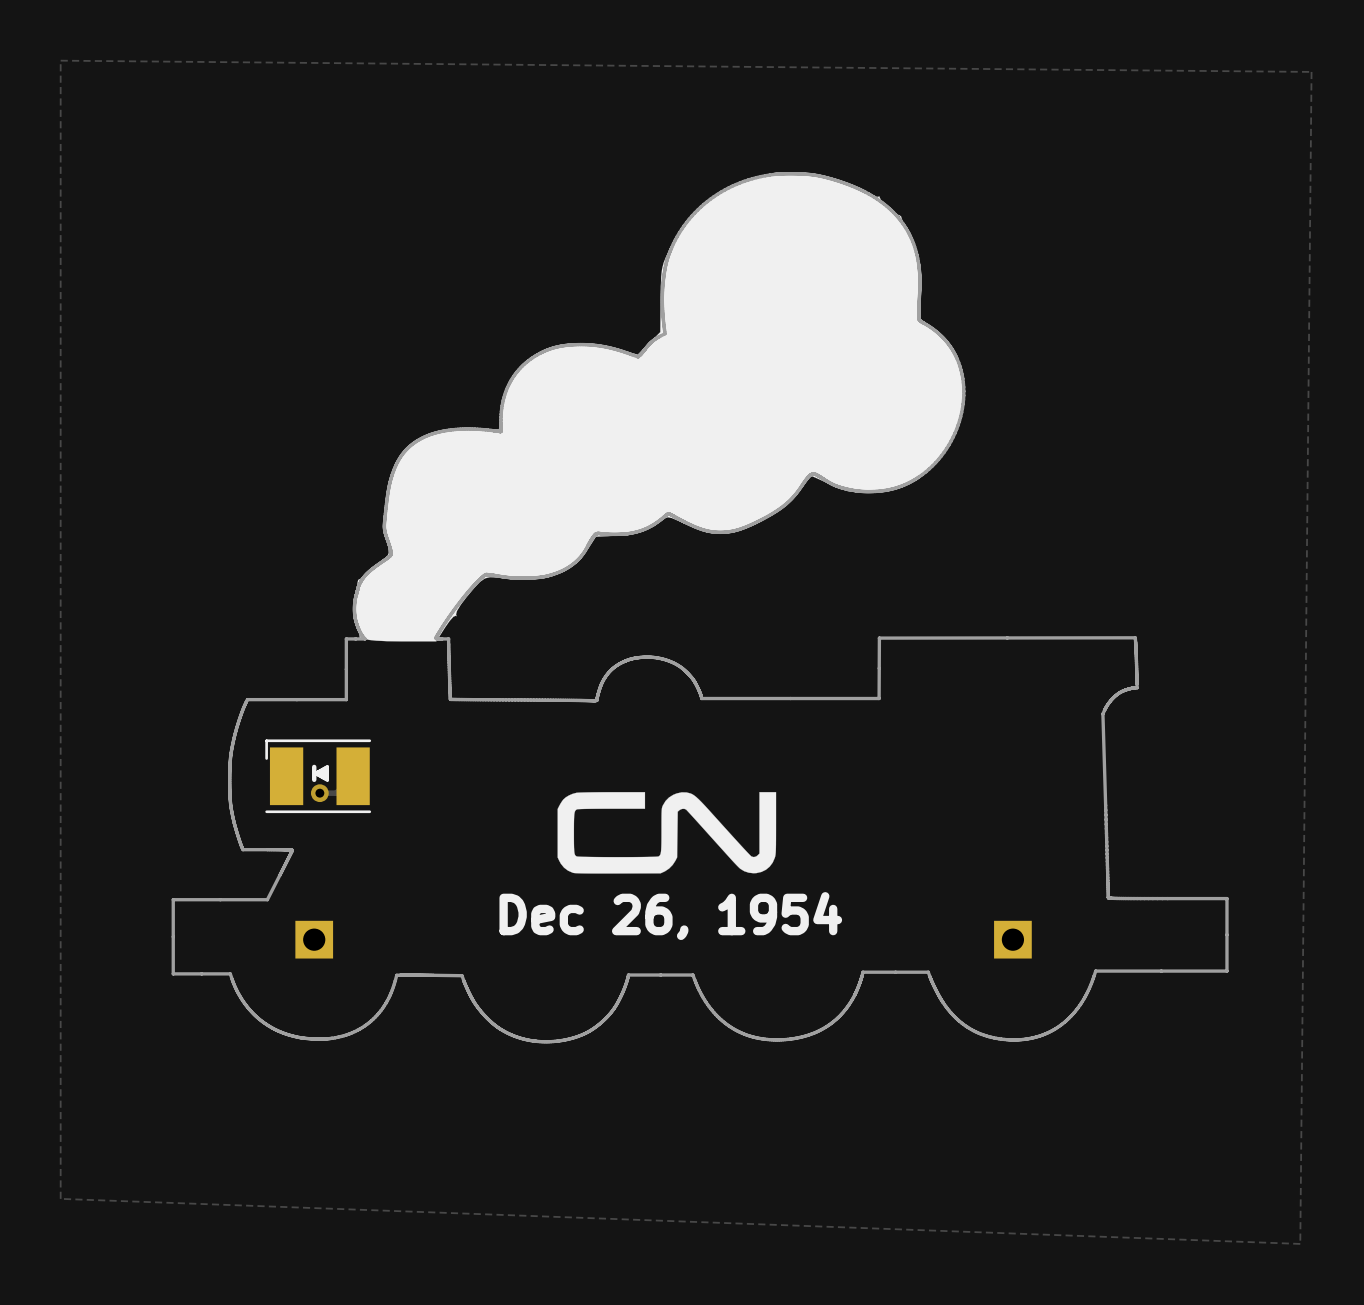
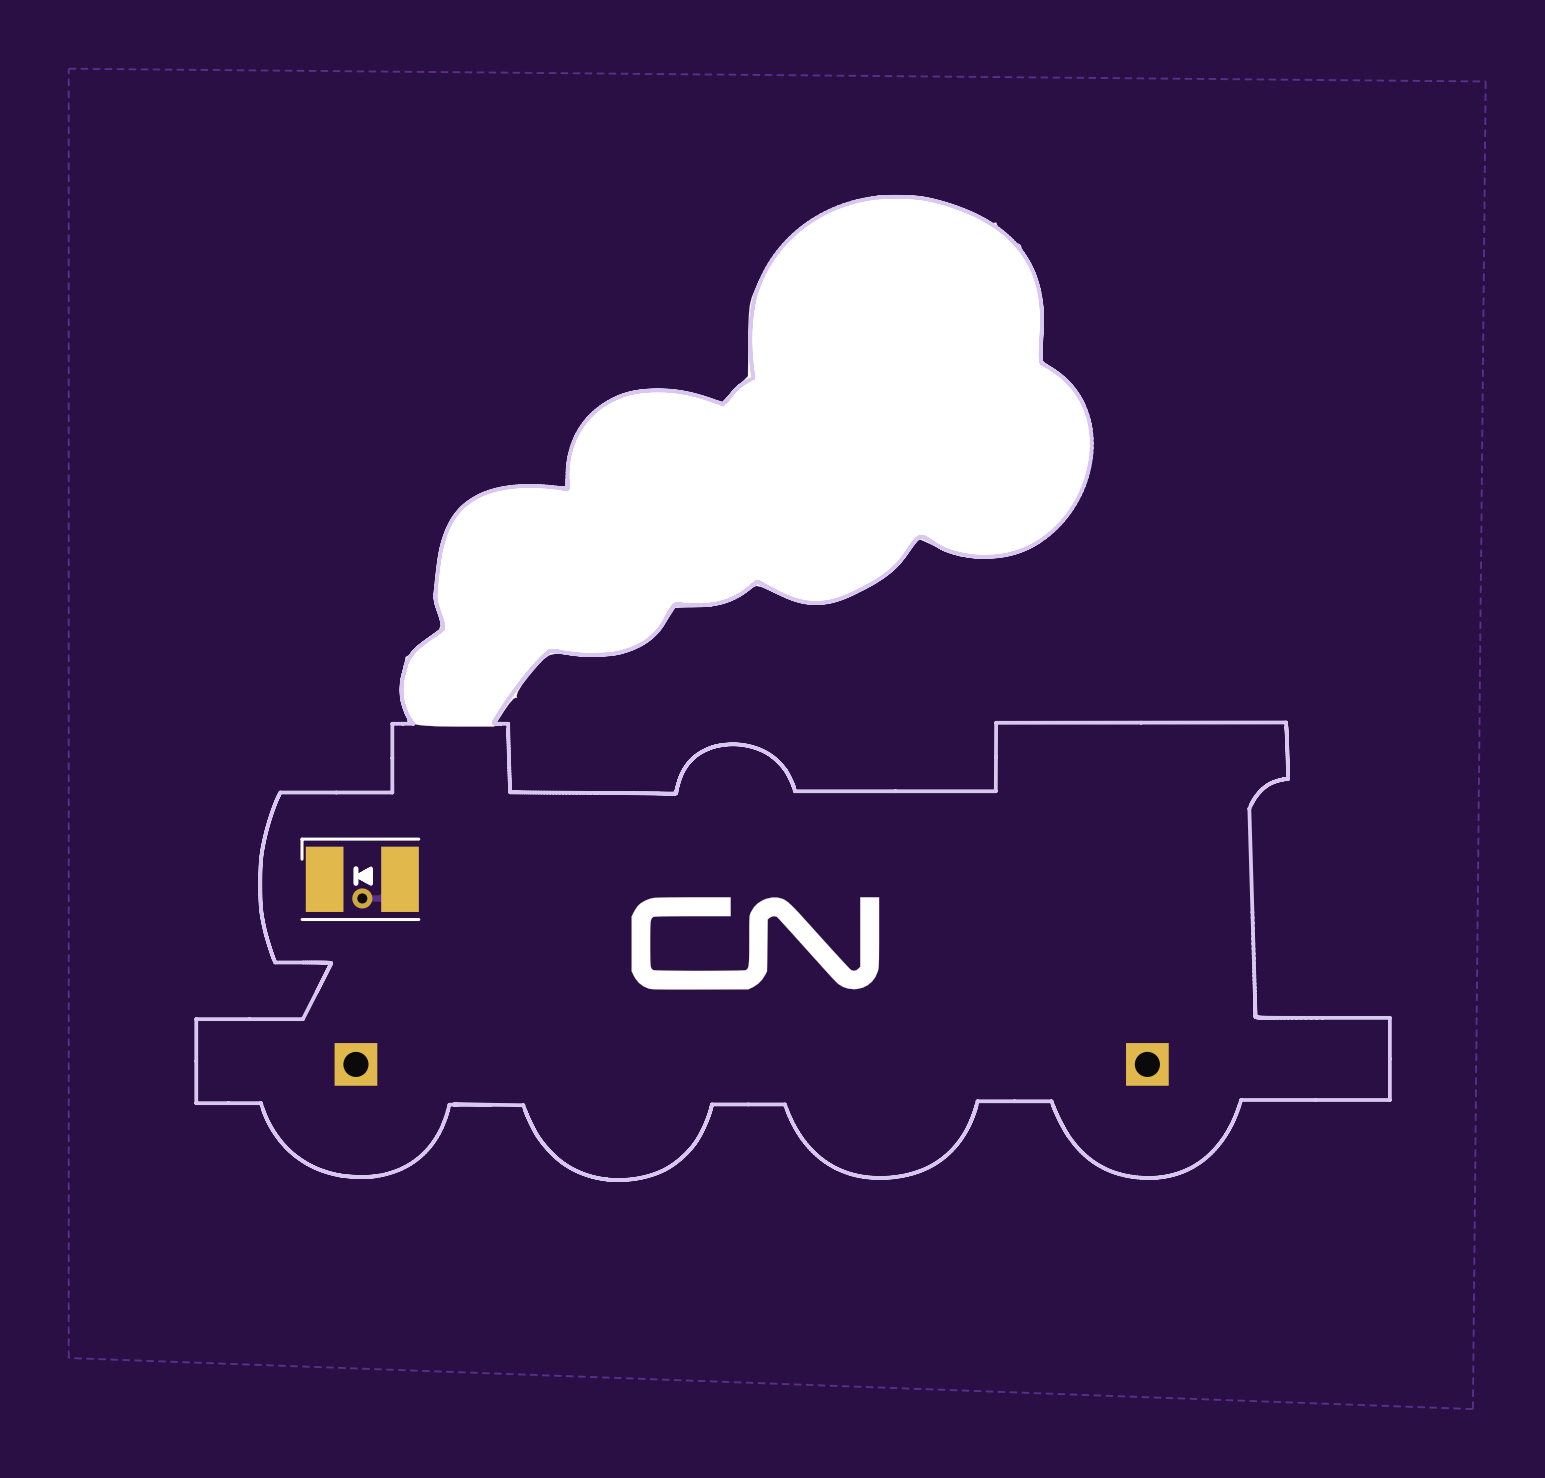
text: Dec 26, 1954 (670, 916) -> none

